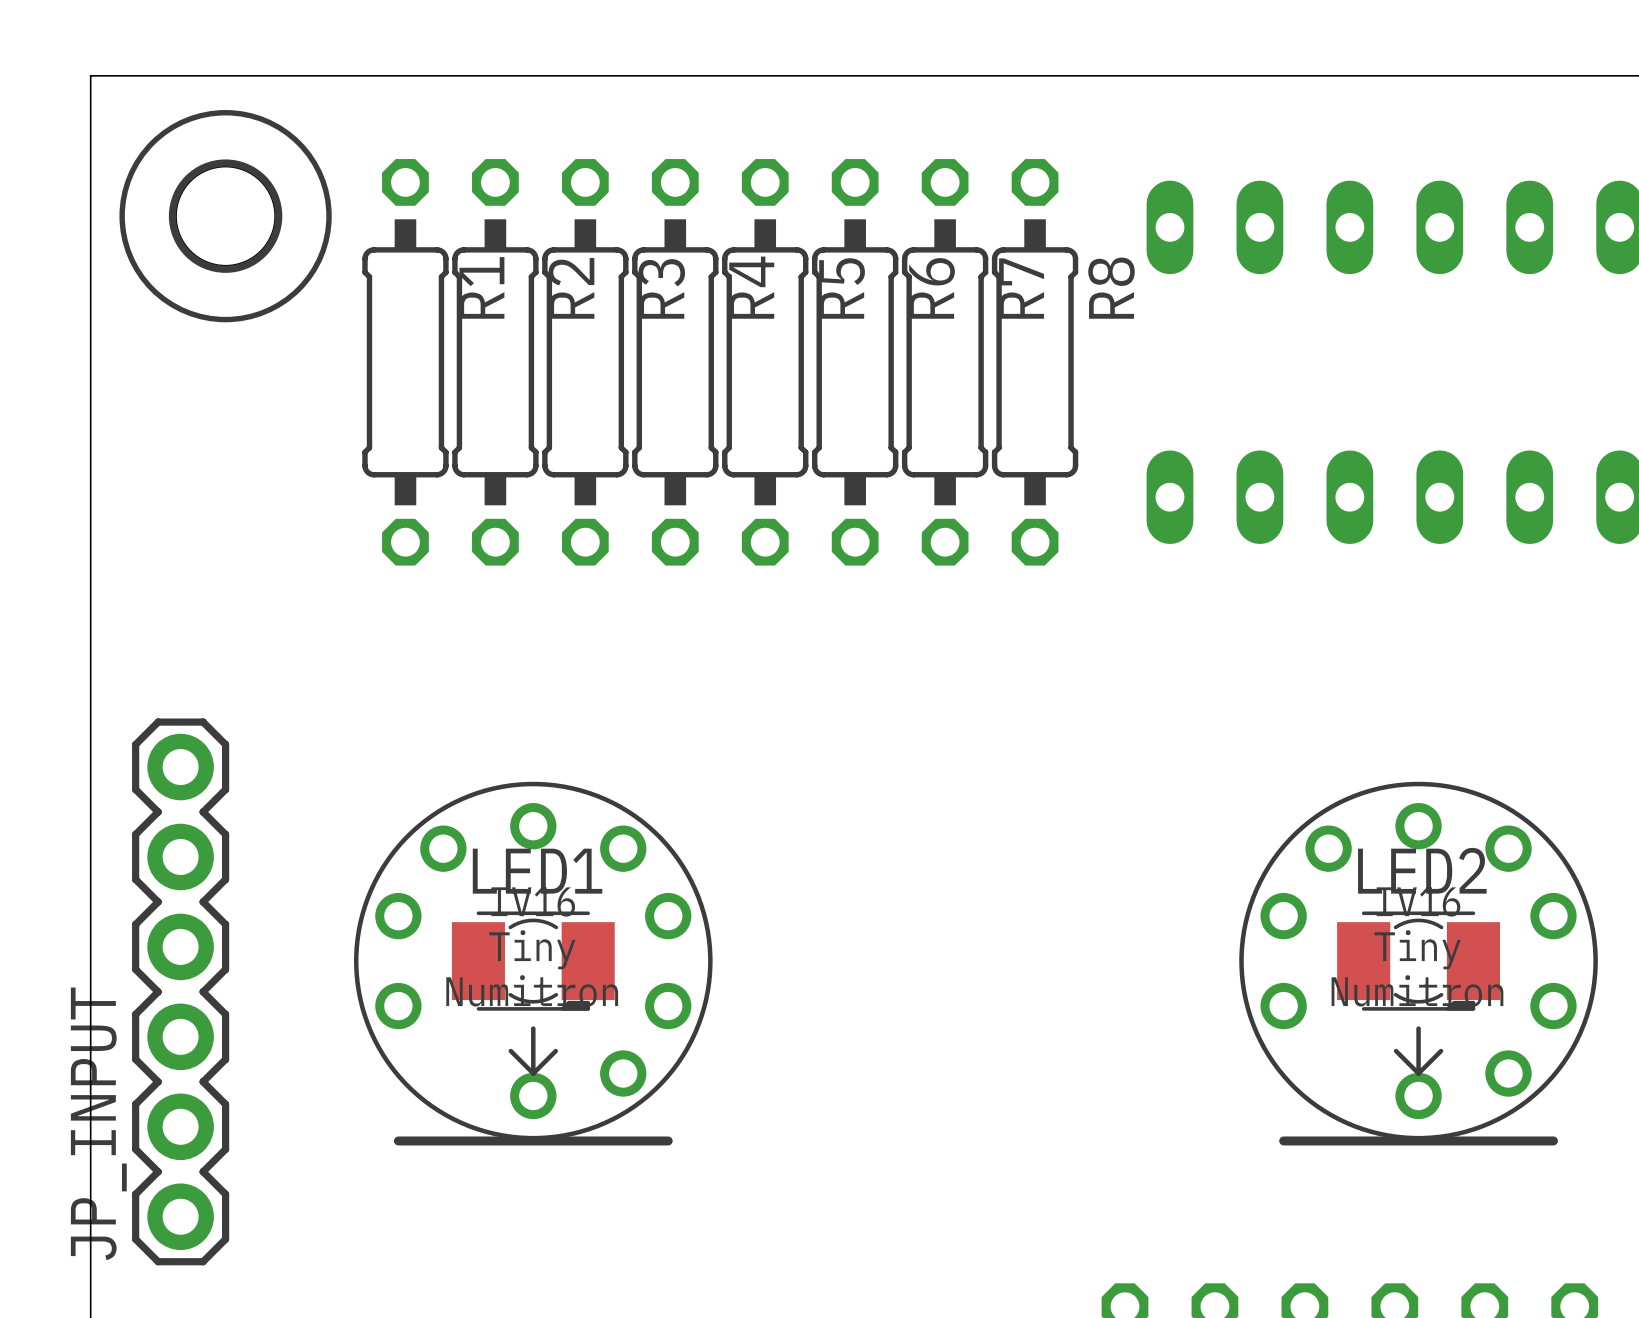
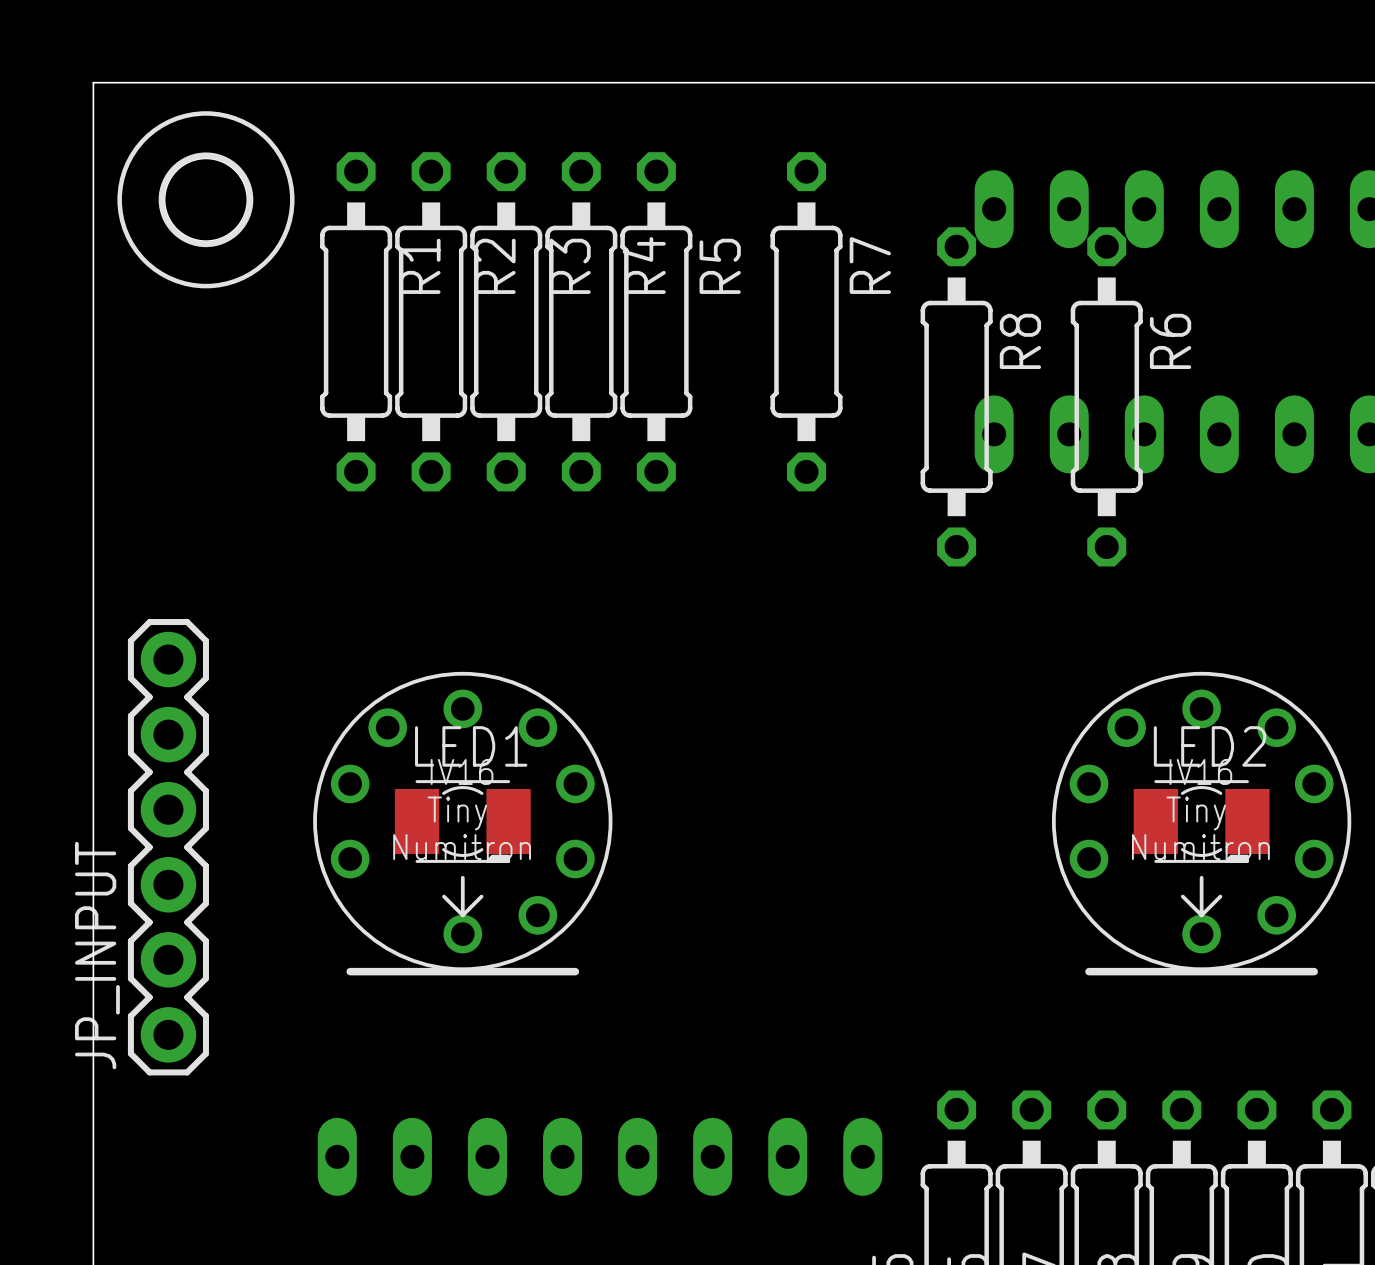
R6 position: (855, 362) -> (1106, 396)
R8 position: (1035, 362) -> (956, 396)

